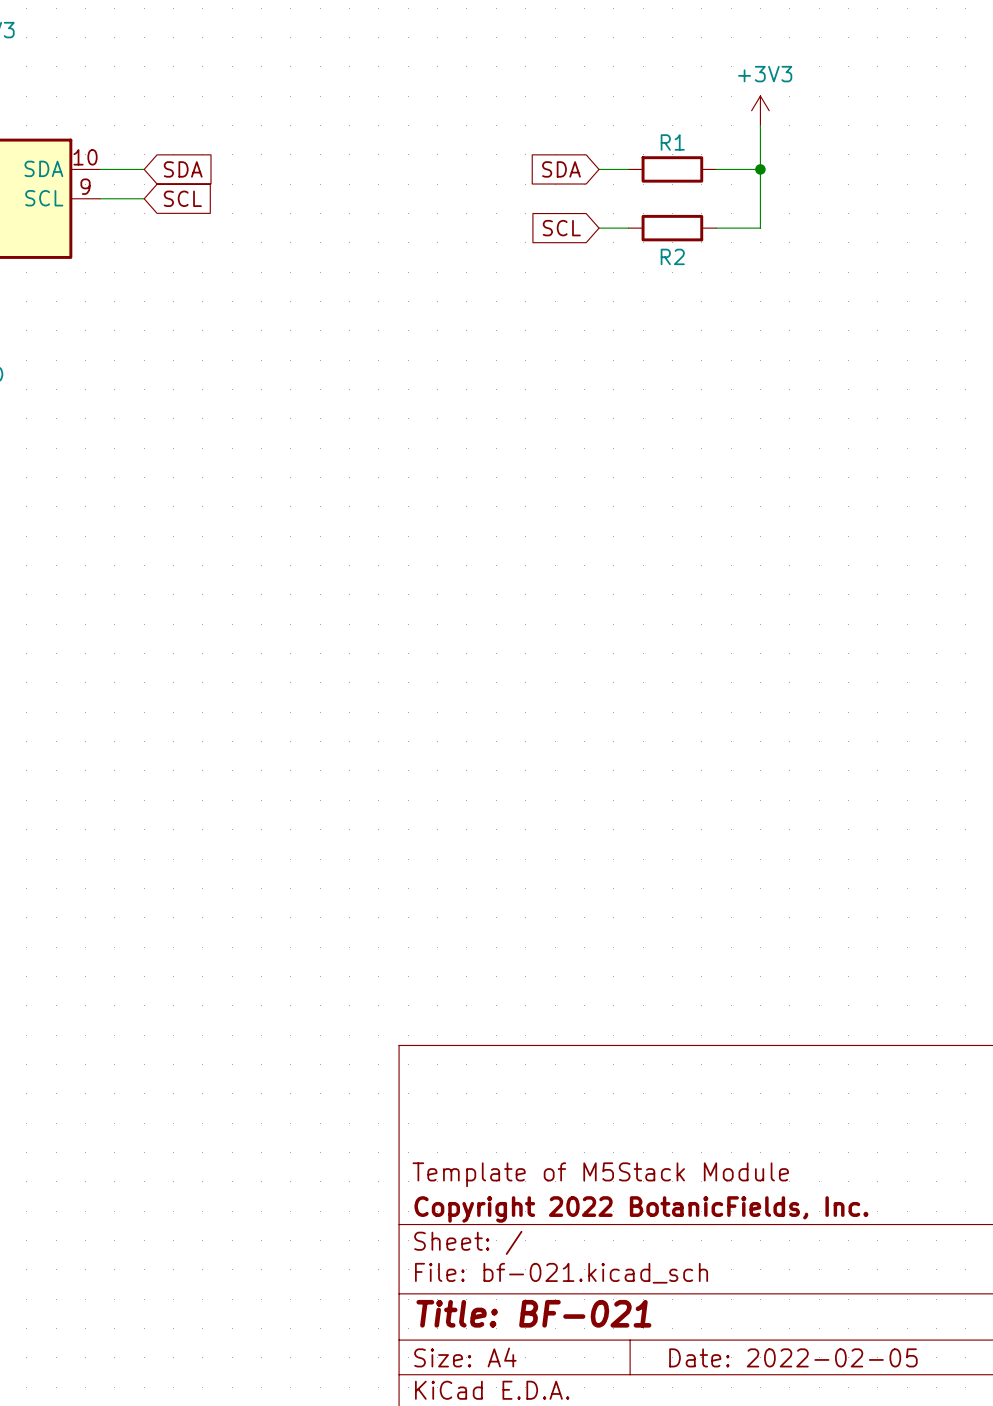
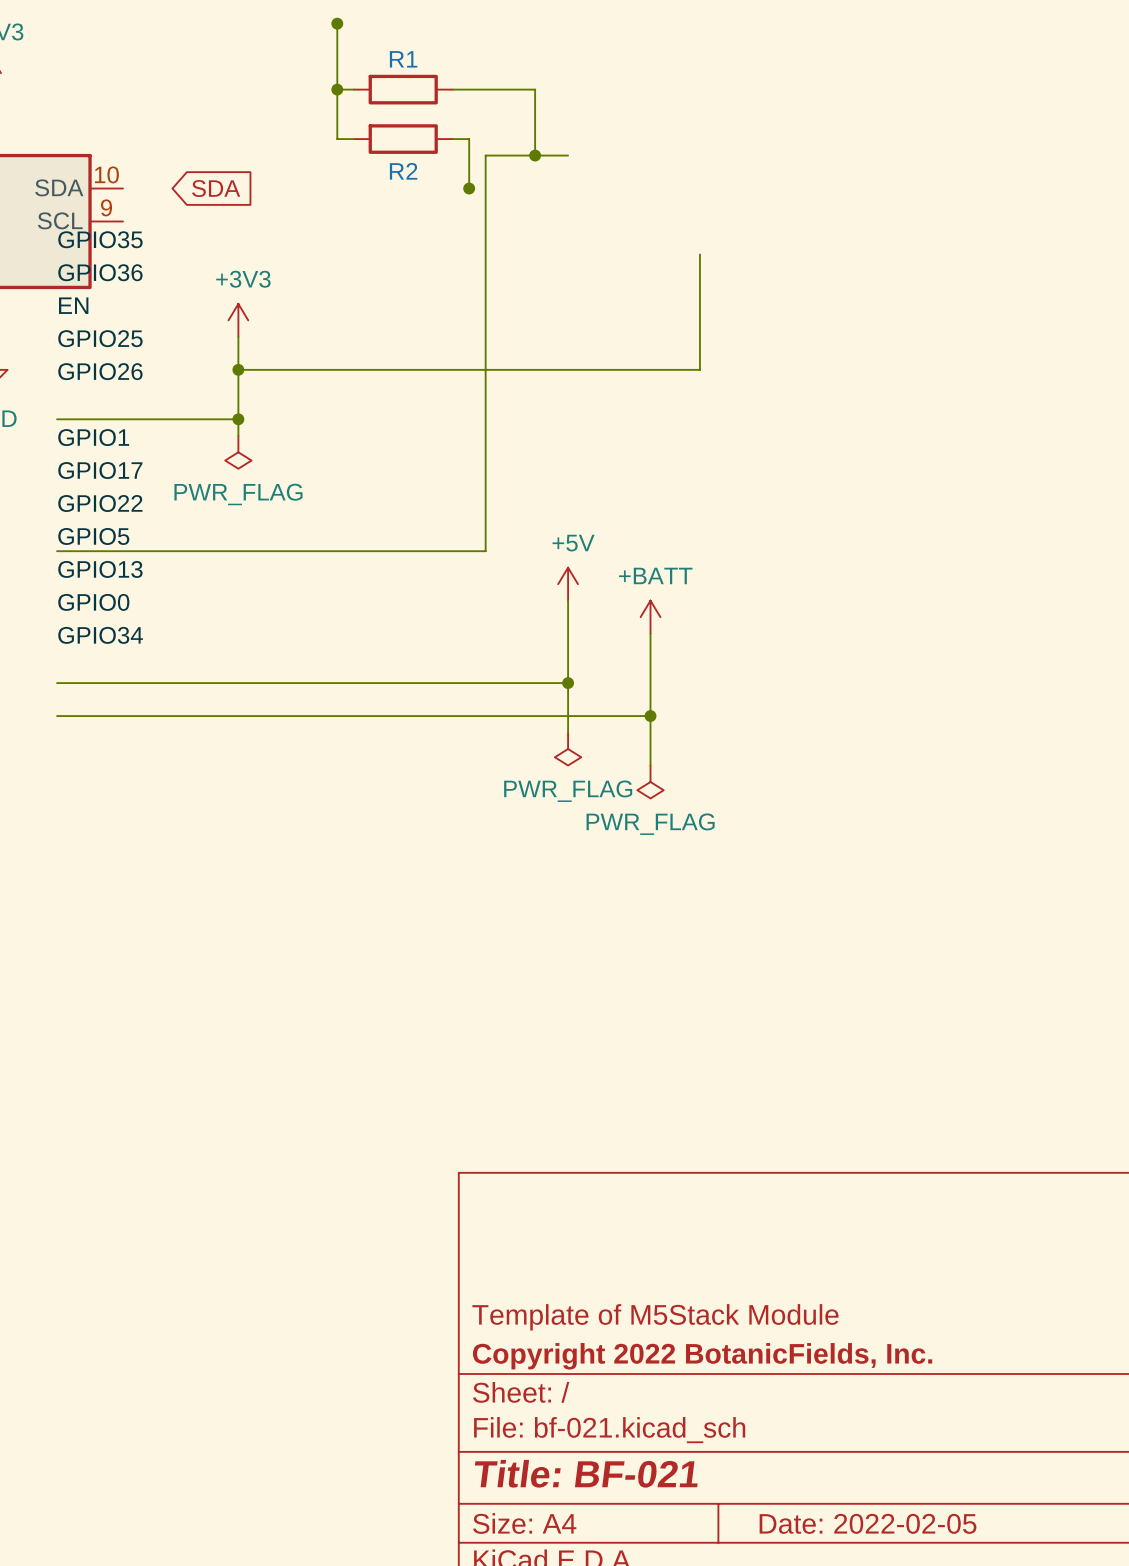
wire: none -> (337, 23) (337, 139) (353, 139)
junction: none -> (337, 23)
wire: none -> (337, 89) (353, 89)
junction: none -> (337, 89)
wire: none -> (452, 89) (535, 89) (535, 155)
power symbol: +3V3 (760, 110) -> none
wire: none -> (452, 139) (469, 139) (469, 188)
wire: (760, 125) (760, 228) (716, 228) -> none
junction: none -> (535, 155)
wire: none -> (568, 155) (485, 155) (485, 551) (57, 551)
wire: (100, 169) (144, 169) -> none
junction: none -> (469, 188)
global label: SDA (561, 169) -> none
wire: (599, 169) (628, 169) -> none
R1 position: (672, 169) -> (403, 89)
wire: (716, 169) (760, 169) -> none
junction: (760, 169) -> none
wire: (100, 198) (144, 198) -> none
global label: SCL (182, 198) -> none
label: none -> GPIO35 (100, 239)
global label: SCL (561, 228) -> none
wire: (599, 228) (628, 228) -> none
wire: none -> (699, 254) (699, 369) (238, 369)
R2 position: (672, 228) -> (403, 139)
label: none -> GPIO36 (100, 272)
label: none -> EN (73, 305)
power symbol: none -> +3V3 (238, 320)
wire: none -> (238, 336) (238, 435)
label: none -> GPIO25 (100, 338)
junction: none -> (238, 369)
label: none -> GPIO26 (100, 371)
wire: none -> (57, 419) (238, 419)
junction: none -> (238, 419)
label: none -> GPIO1 (93, 437)
power symbol: none -> PWR_FLAG (238, 452)
label: none -> GPIO17 (100, 470)
label: none -> GPIO22 (100, 503)
label: none -> GPIO5 (93, 536)
label: none -> GPIO13 (100, 569)
power symbol: none -> +5V (568, 584)
wire: none -> (568, 600) (568, 732)
label: none -> GPIO0 (93, 602)
power symbol: none -> +BATT (650, 617)
wire: none -> (650, 633) (650, 765)
label: none -> GPIO34 (100, 635)
wire: none -> (57, 683) (568, 683)
junction: none -> (568, 683)
wire: none -> (57, 716) (650, 716)
junction: none -> (650, 716)
power symbol: none -> PWR_FLAG (568, 749)
power symbol: none -> PWR_FLAG (650, 781)

